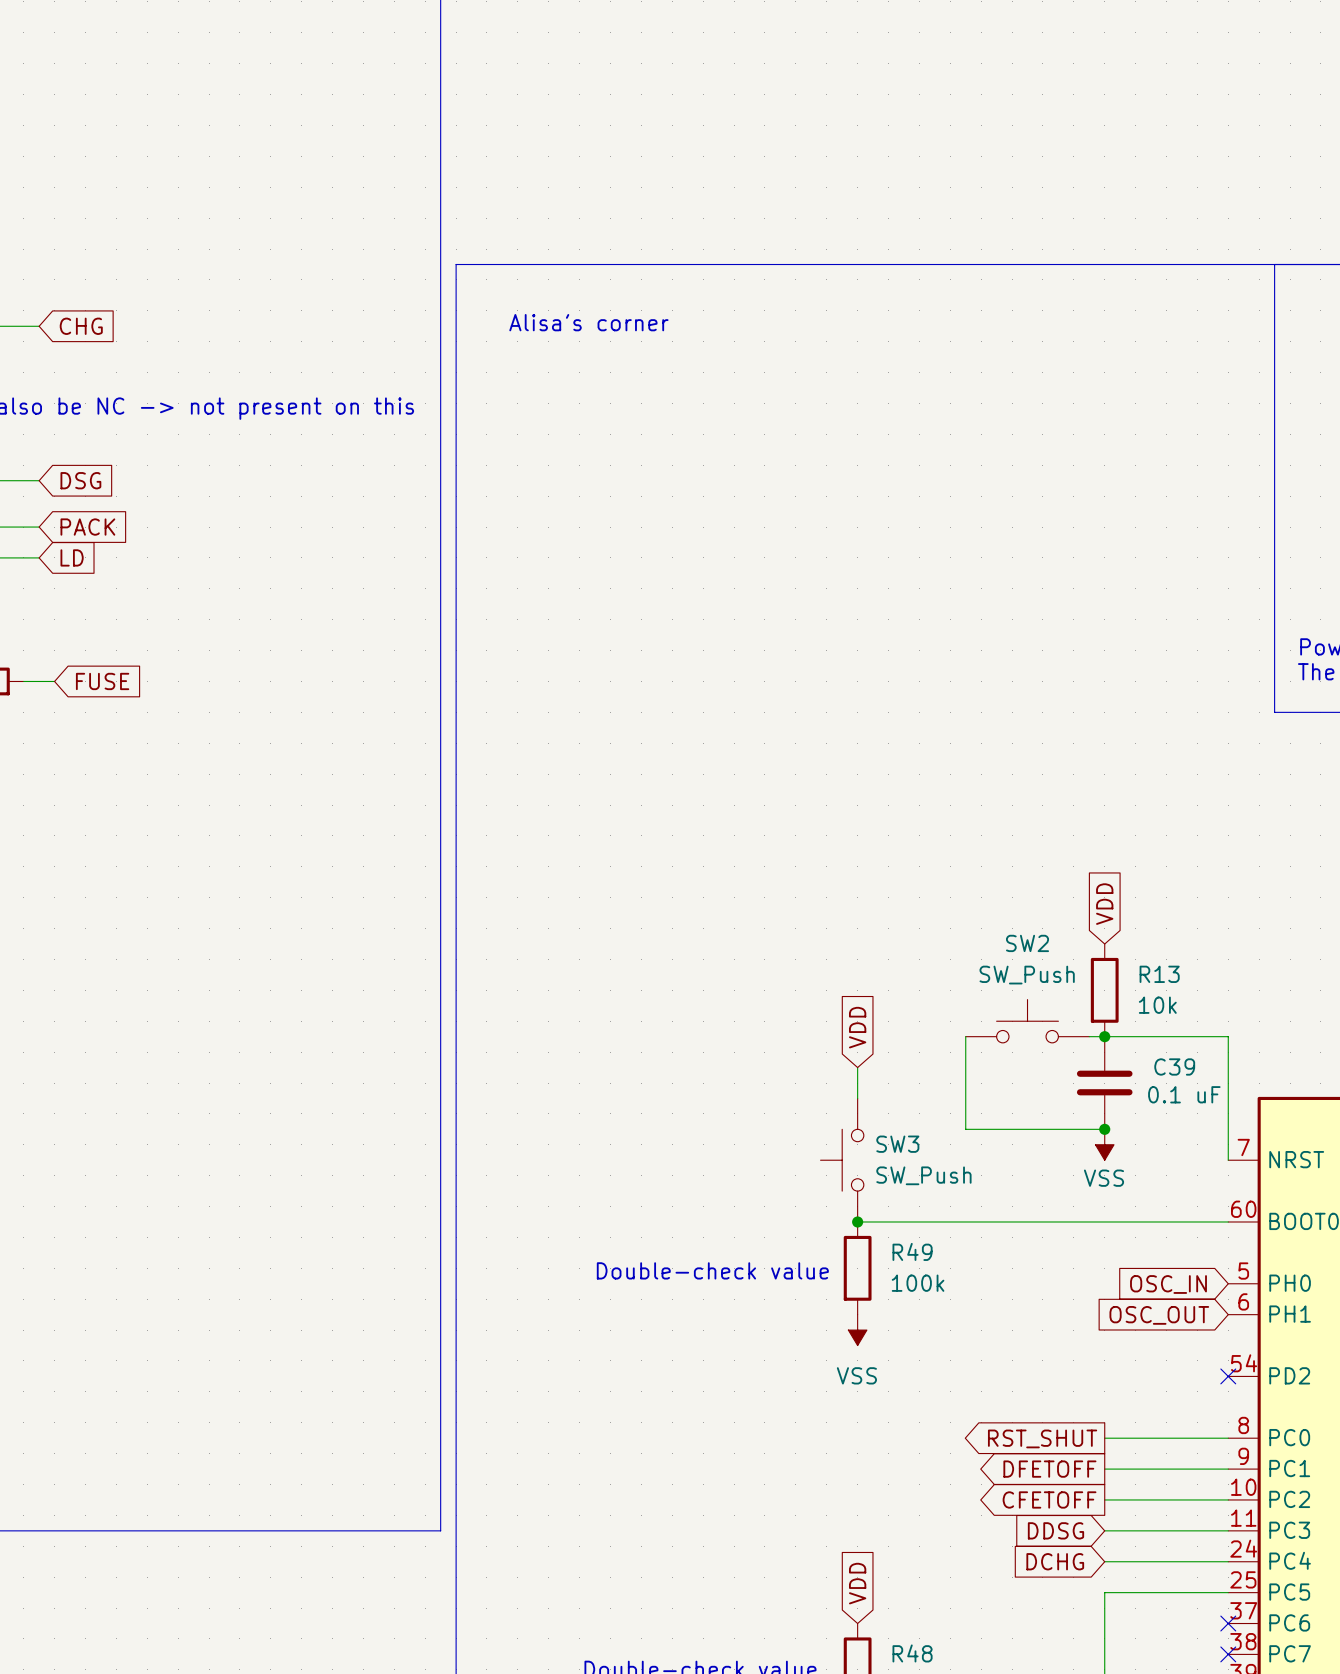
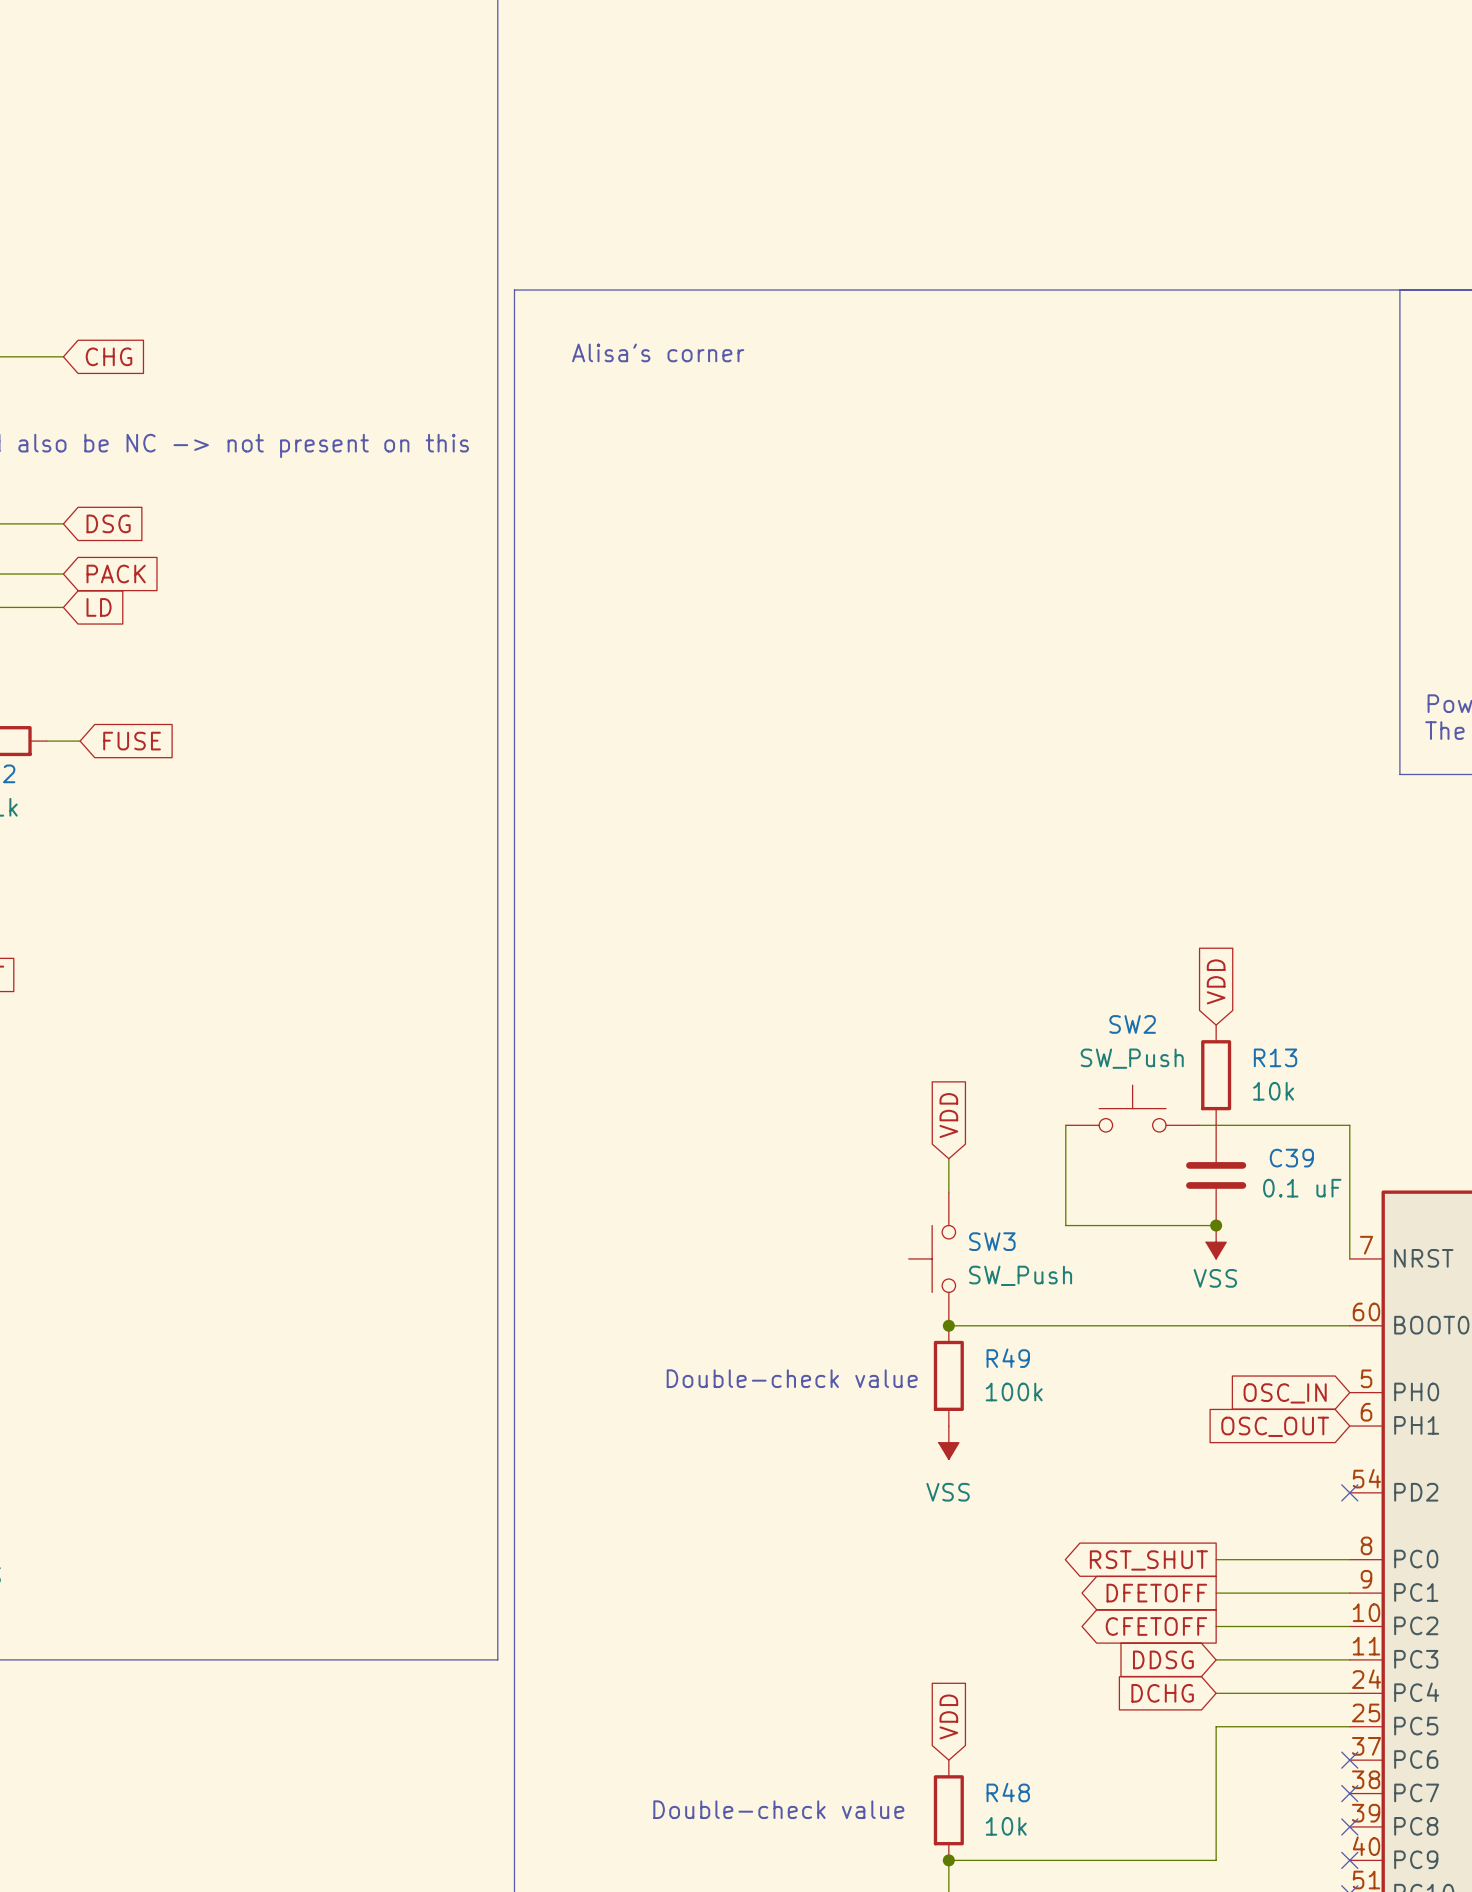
junction: (1104, 1036) -> none

